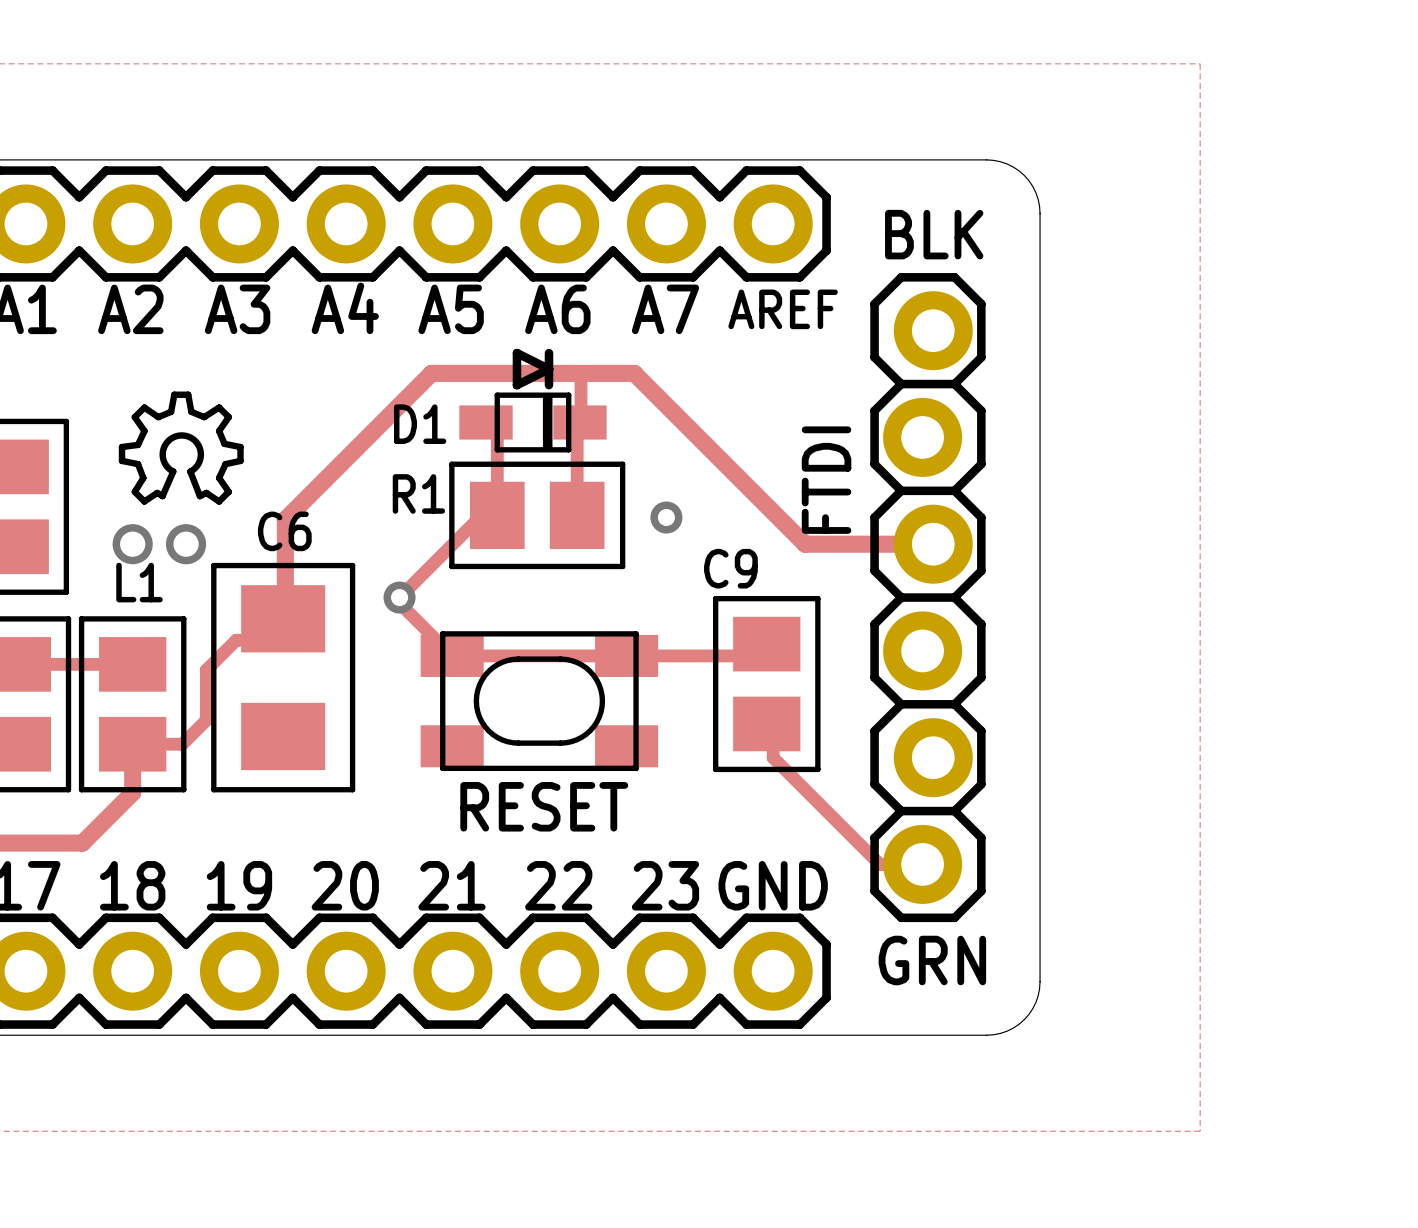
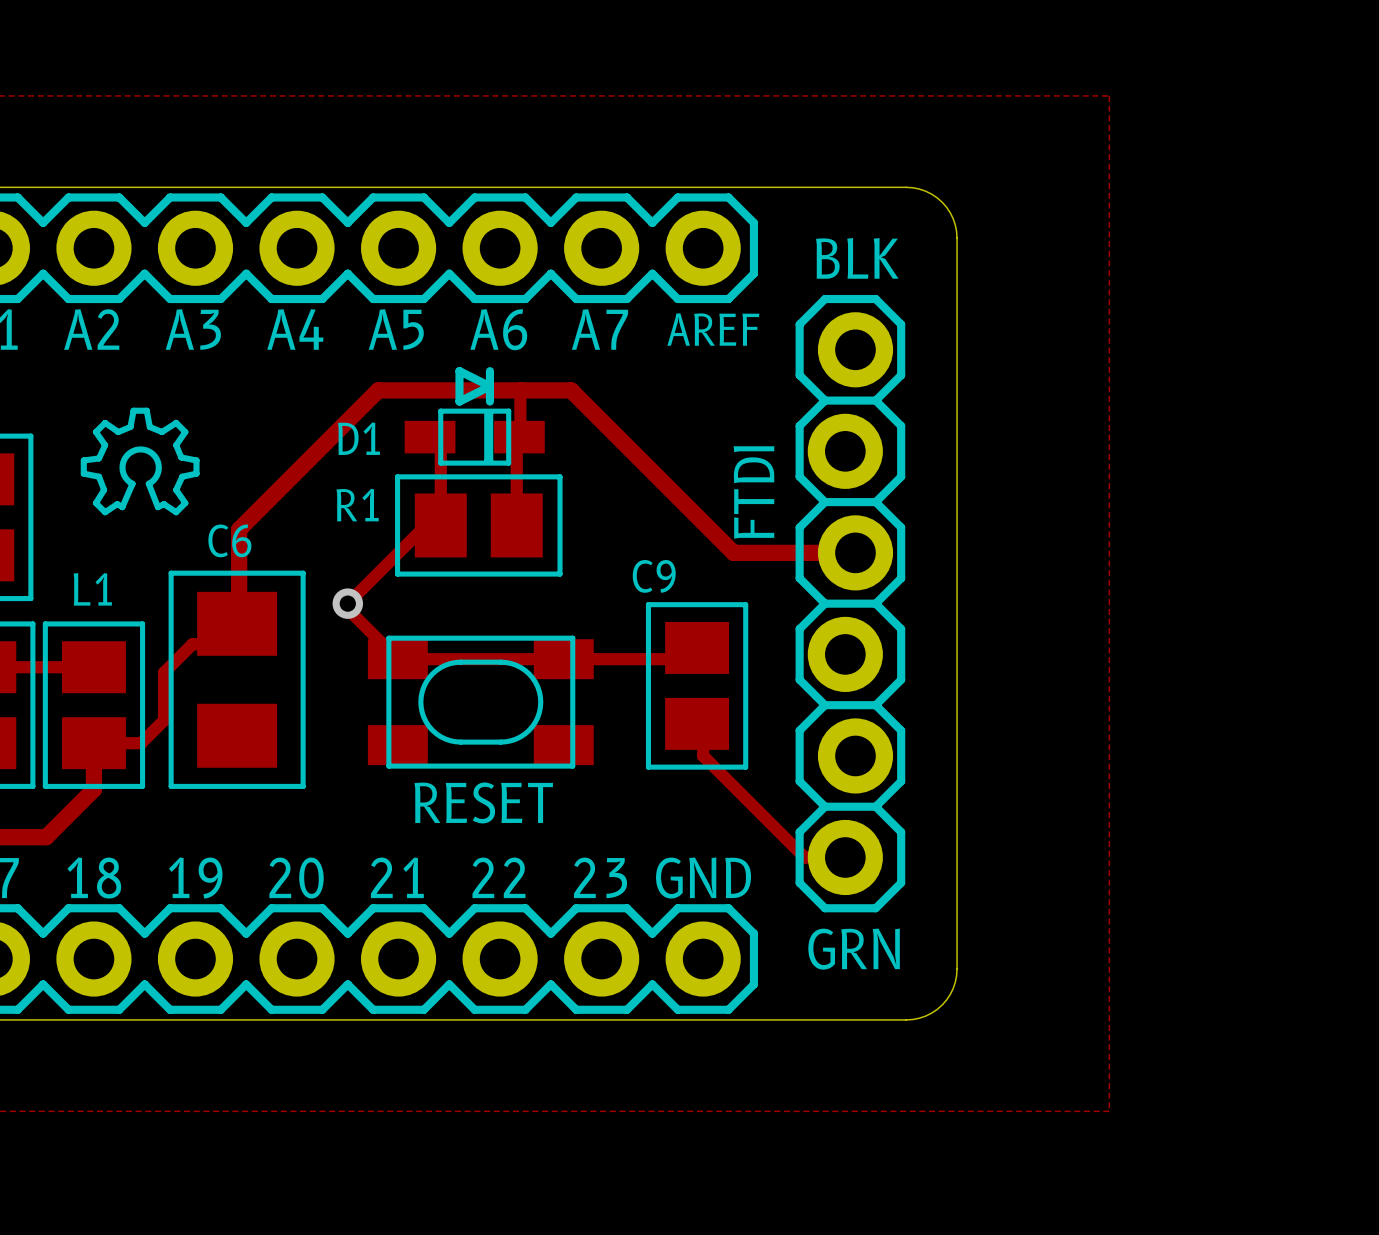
via: (666, 517) -> none
via: (132, 544) -> none
via: (186, 544) -> none

